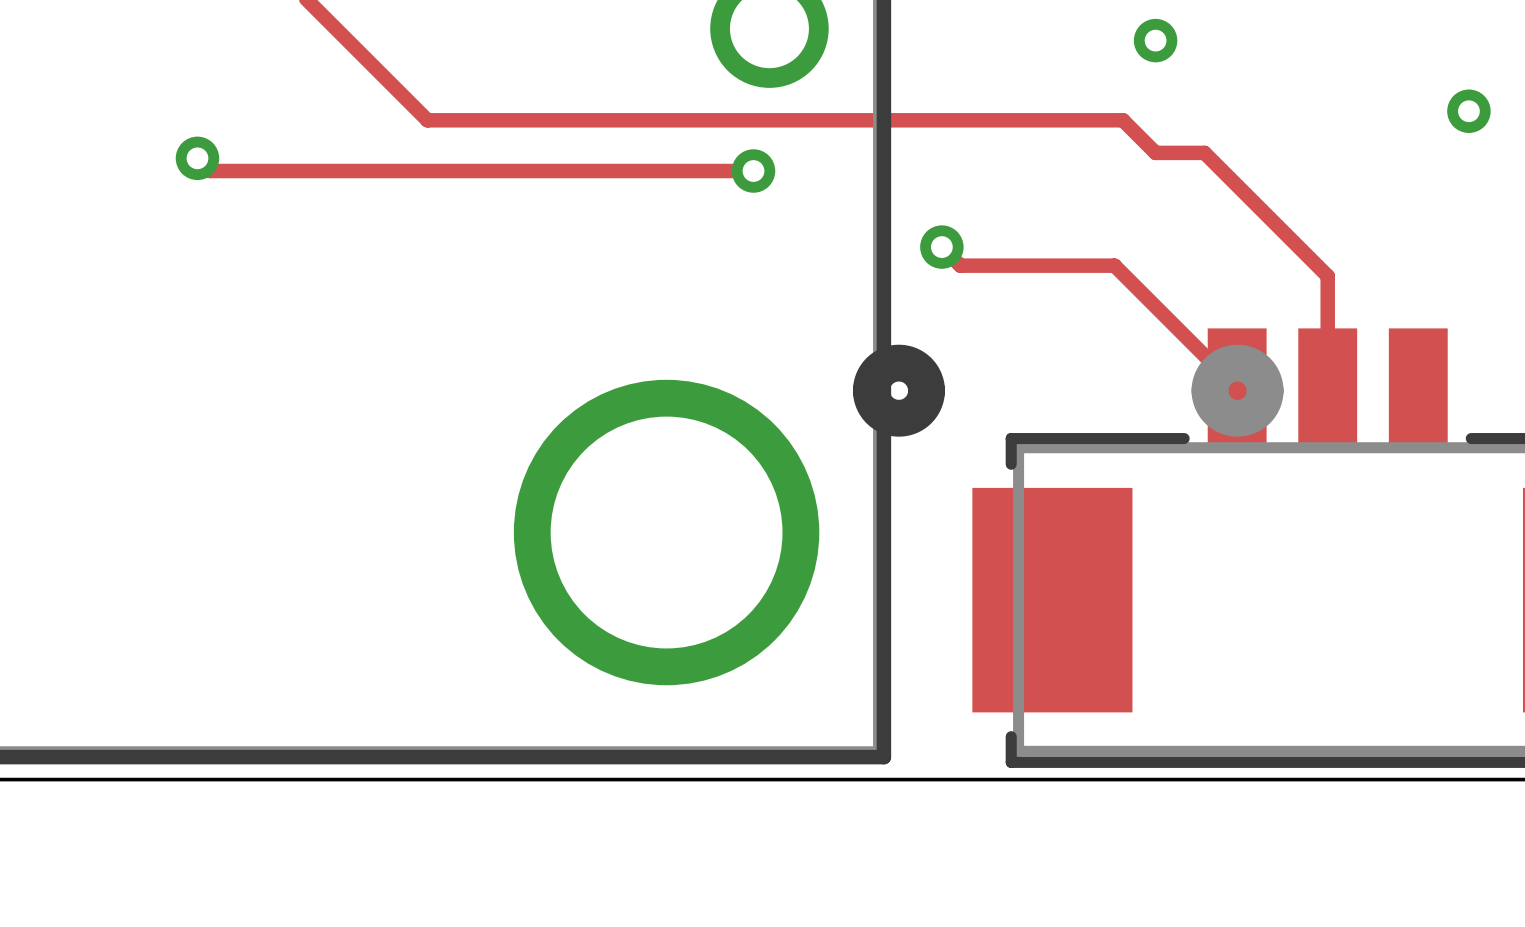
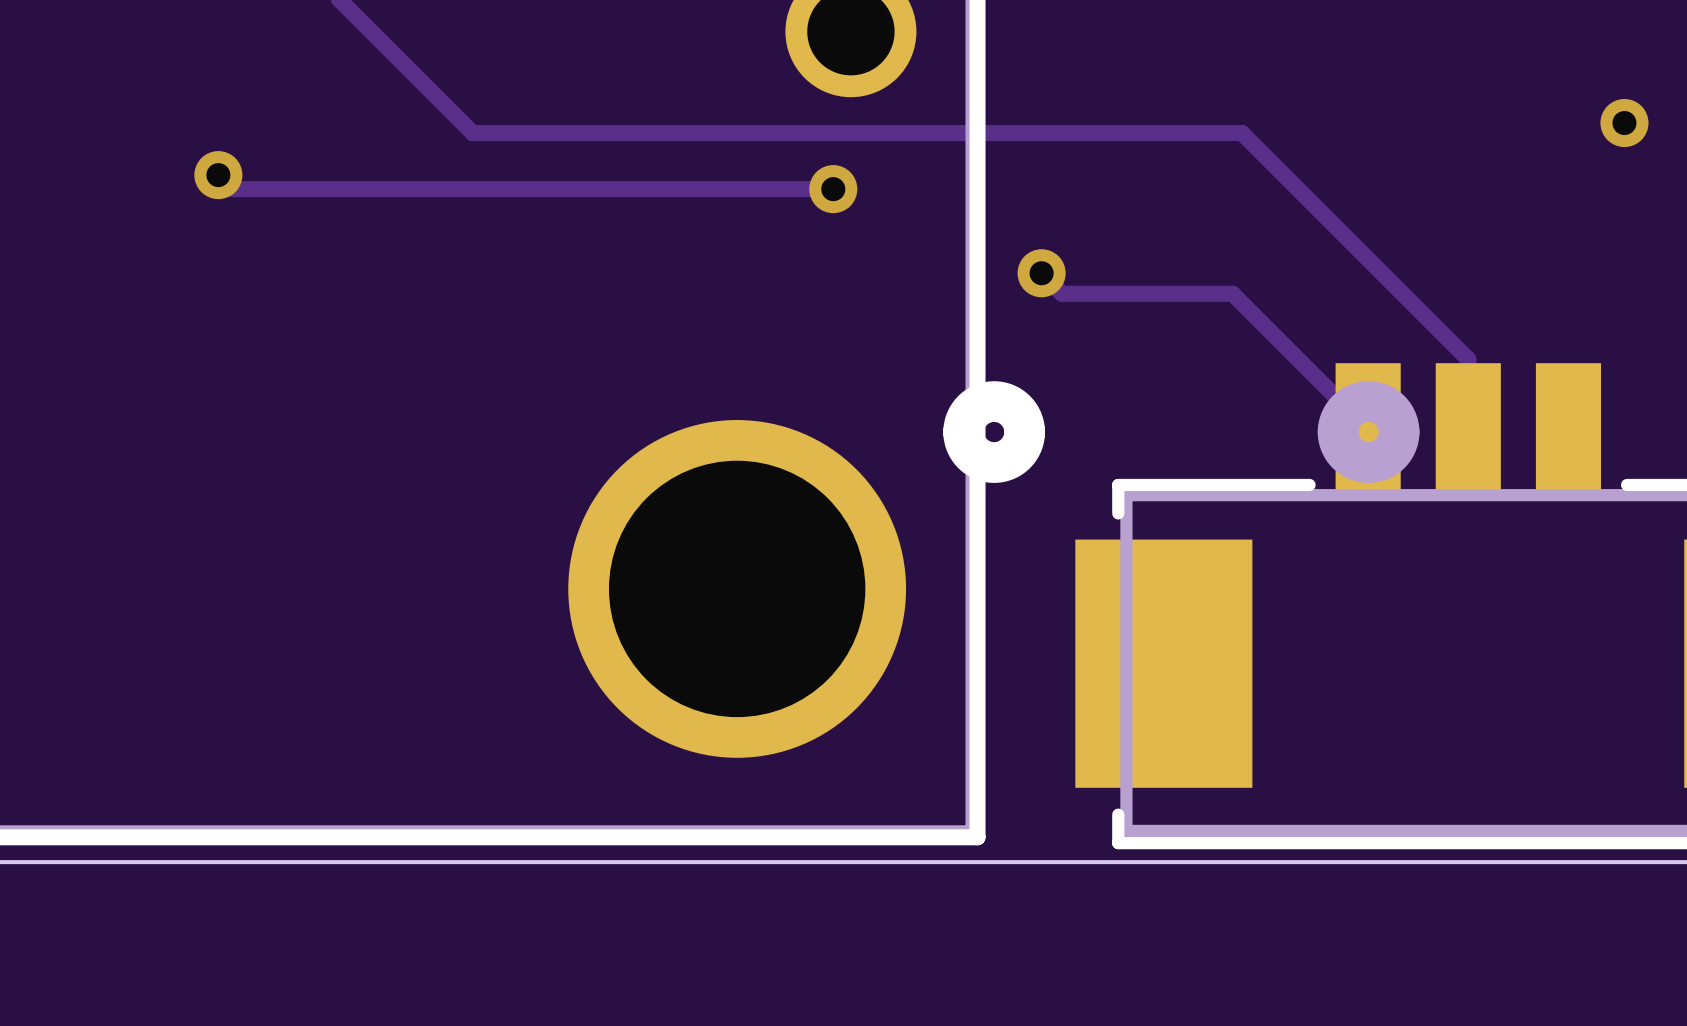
via: (1155, 40) -> none
track: (1155, 152) (1204, 152) (1327, 276) (1327, 325) -> (1277, 169) (1468, 359)

